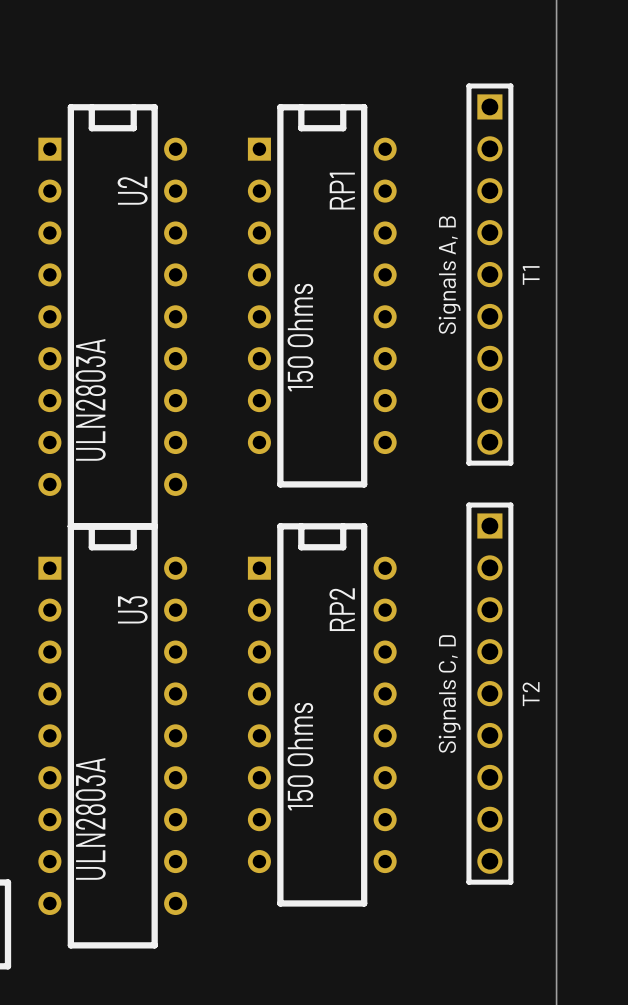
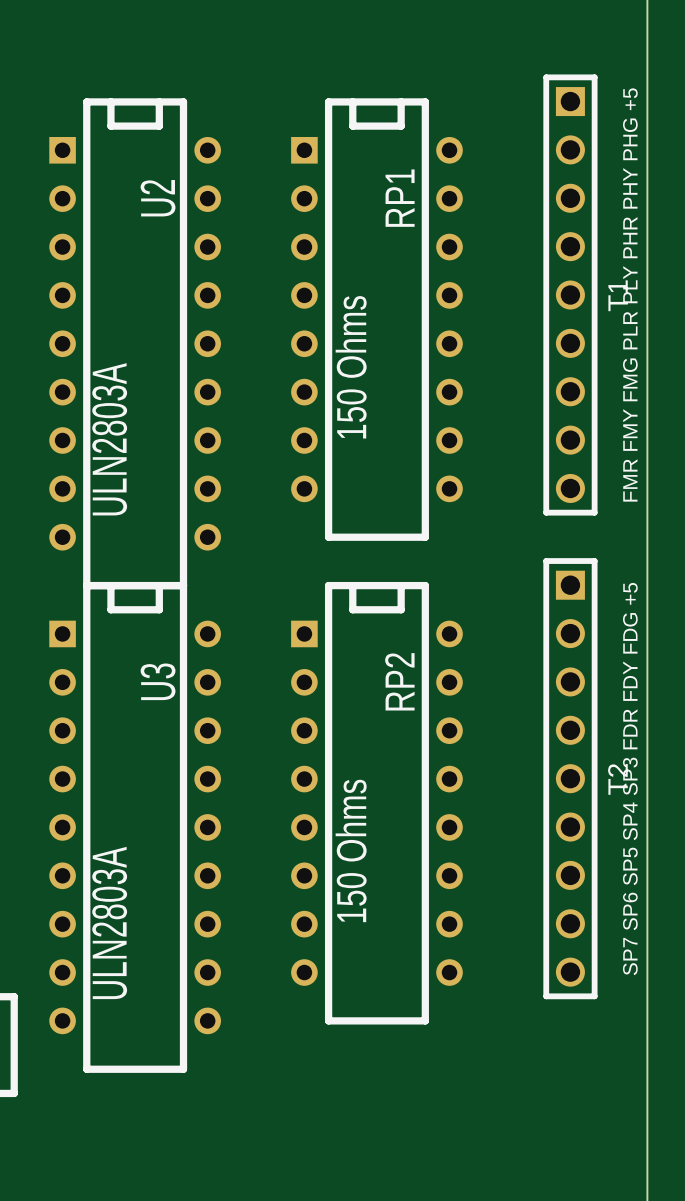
T1 value: Signals A, B (449, 275) -> FMR FMY FMG PLR PLY PHR PHY PHG +5 (630, 294)
T2 value: Signals C, D (449, 694) -> SP7 SP6 SP5 SP4 SP3 FDR FDY FDG +5 (630, 779)

